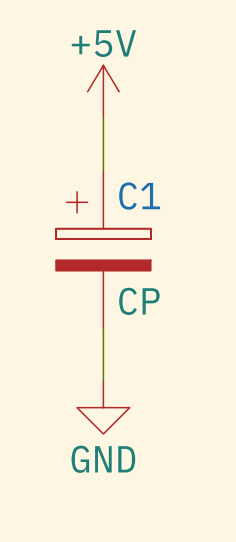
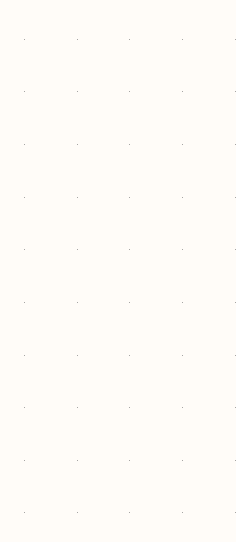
power symbol: +5V (103, 91) -> none
wire: (103, 118) (103, 170) -> none
C1: CP (103, 249) -> none
wire: (103, 328) (103, 381) -> none
power symbol: GND (103, 407) -> none

